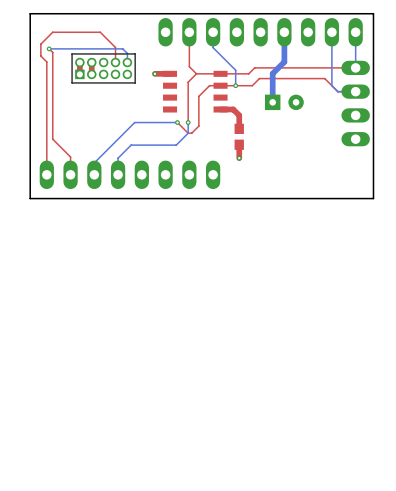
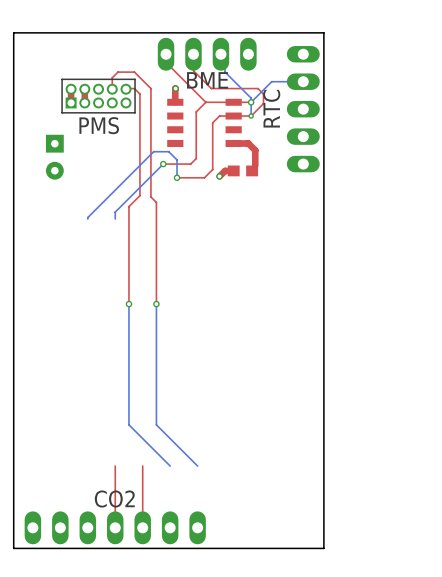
board edge: (298, 13) (373, 13) (373, 198) (30, 198) -> (323, 32) (323, 548) (13, 548) (13, 246)
top track: (189, 32) (189, 66) -> (166, 54) (166, 62) (197, 94)
part: none -> (207, 54)
part rotation: 0° (213, 32) -> 90° clockwise (303, 109)
part position: (213, 32) -> (303, 109)
bottom track: (284, 32) (284, 61) (272, 73) (272, 102) -> none
part: (320, 32) -> none
bottom track: (331, 32) (331, 85) (337, 91) (355, 91) -> none
bottom track: (355, 32) (355, 67) -> none
top track: (49, 48) (52, 52) (52, 139) (70, 156) (70, 174) -> none
bottom track: (49, 48) (122, 48) (127, 53) (127, 62) -> none
via: (49, 48) -> none
top track: (115, 52) (115, 47) (100, 32) (52, 32) (40, 44) (40, 56) (46, 61) (46, 174) -> (112, 77) (117, 72) (134, 72) (150, 88) (150, 197) (156, 202) (156, 304)
text: none -> BME (207, 80)
bottom track: none -> (303, 81) (271, 81) (251, 102)
via: none -> (175, 88)
top track: none -> (126, 89) (134, 88) (139, 94) (139, 195) (128, 206) (128, 304)
top track: (355, 67) (254, 67) (248, 73) (235, 73) -> none
via: (154, 73) -> none
top track: (170, 73) (154, 73) -> (175, 102) (175, 88)
via: none -> (251, 102)
text: none -> RTC (271, 108)
top track: (209, 85) (198, 96) (198, 126) (191, 133) (188, 133) (177, 122) -> (220, 116) (212, 122) (212, 169) (204, 177) (177, 177)
top track: (235, 85) (252, 85) (259, 78) (324, 78) (337, 91) (355, 91) -> (251, 116) (263, 103) (263, 94) (258, 88) (211, 88) (193, 70) (193, 54)
text: none -> PMS (99, 125)
part rotation: 0° (284, 102) -> 90° clockwise (54, 157)
part position: (284, 102) -> (54, 157)
part: (355, 103) -> none
bottom track: (177, 122) (134, 122) (94, 162) (94, 173) -> (177, 177) (177, 159) (168, 151) (153, 151) (87, 217)
via: (177, 122) -> none
top track: none -> (196, 158) (190, 164) (163, 164)
bottom track: (188, 122) (188, 133) (176, 145) (131, 145) (118, 158) (118, 168) -> (163, 164) (115, 212)
via: (188, 122) -> none
via: none -> (163, 164)
top track: none -> (233, 170) (225, 170) (219, 176)
part rotation: 0° (239, 136) -> 90° clockwise (242, 170)
via: none -> (219, 176)
via: none -> (177, 177)
top track: (239, 144) (239, 158) -> none
via: (239, 158) -> none
part: (129, 174) -> none
bottom track: none -> (128, 304) (128, 424) (170, 466)
via: none -> (128, 304)
bottom track: none -> (156, 304) (156, 424) (197, 466)
via: none -> (156, 304)
top track: none -> (115, 466) (115, 527)
top track: none -> (142, 466) (142, 527)
text: none -> CO2 (114, 499)
part: none -> (115, 527)

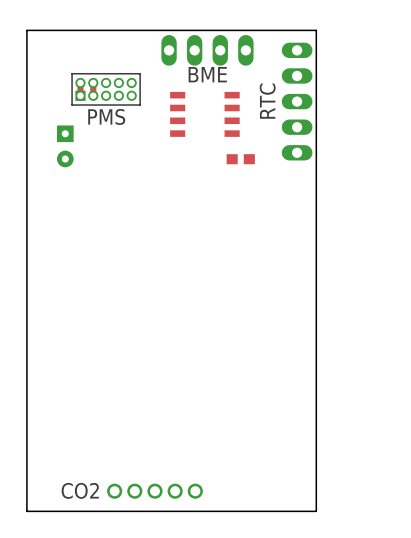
top track: (166, 54) (166, 62) (205, 102) -> none
top track: (193, 54) (193, 70) (211, 88) (258, 88) (263, 94) (263, 103) (251, 116) (219, 116) (212, 122) (212, 169) (204, 177) (177, 177) -> none
bottom track: (225, 54) (225, 72) (251, 98) (251, 116) -> none
bottom track: (303, 81) (271, 81) (251, 102) -> none
top track: (175, 88) (175, 102) -> none
via: (175, 88) -> none
top track: (112, 89) (112, 77) (117, 72) (134, 72) (150, 88) (150, 197) (156, 202) (156, 304) -> none
top track: (126, 89) (134, 88) (139, 94) (139, 195) (128, 206) (128, 304) -> none
top track: (205, 102) (196, 111) (196, 158) (190, 164) (163, 164) -> none
top track: (251, 102) (205, 102) -> none
via: (251, 102) -> none
via: (251, 116) -> none
top track: (233, 143) (248, 143) (255, 150) (255, 165) -> none
bottom track: (163, 164) (115, 212) (115, 218) -> none
via: (163, 164) -> none
top track: (233, 170) (225, 170) (219, 176) -> none
via: (219, 176) -> none
bottom track: (177, 177) (177, 159) (168, 151) (153, 151) (87, 218) -> none
via: (177, 177) -> none
bottom track: (128, 304) (128, 424) (170, 466) -> none
via: (128, 304) -> none
bottom track: (156, 304) (156, 424) (197, 466) -> none
via: (156, 304) -> none
top track: (115, 466) (115, 527) -> none
top track: (142, 466) (142, 527) -> none
text position: CO2 (114, 499) -> CO2 (80, 490)
part: none -> (154, 491)
part: (115, 527) -> none

